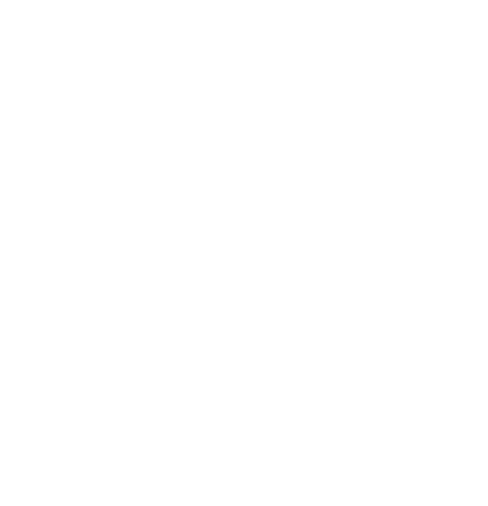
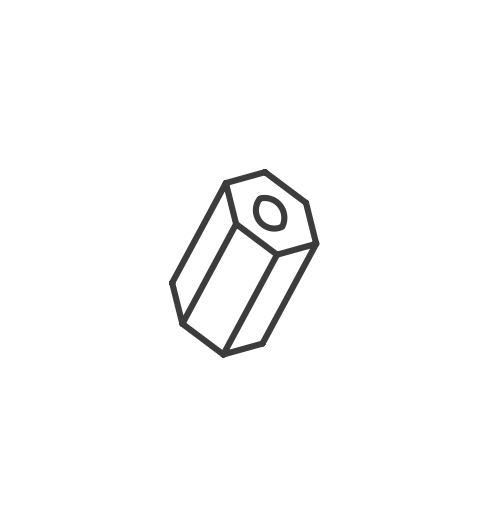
drawing: none -> [169, 169, 320, 358]

